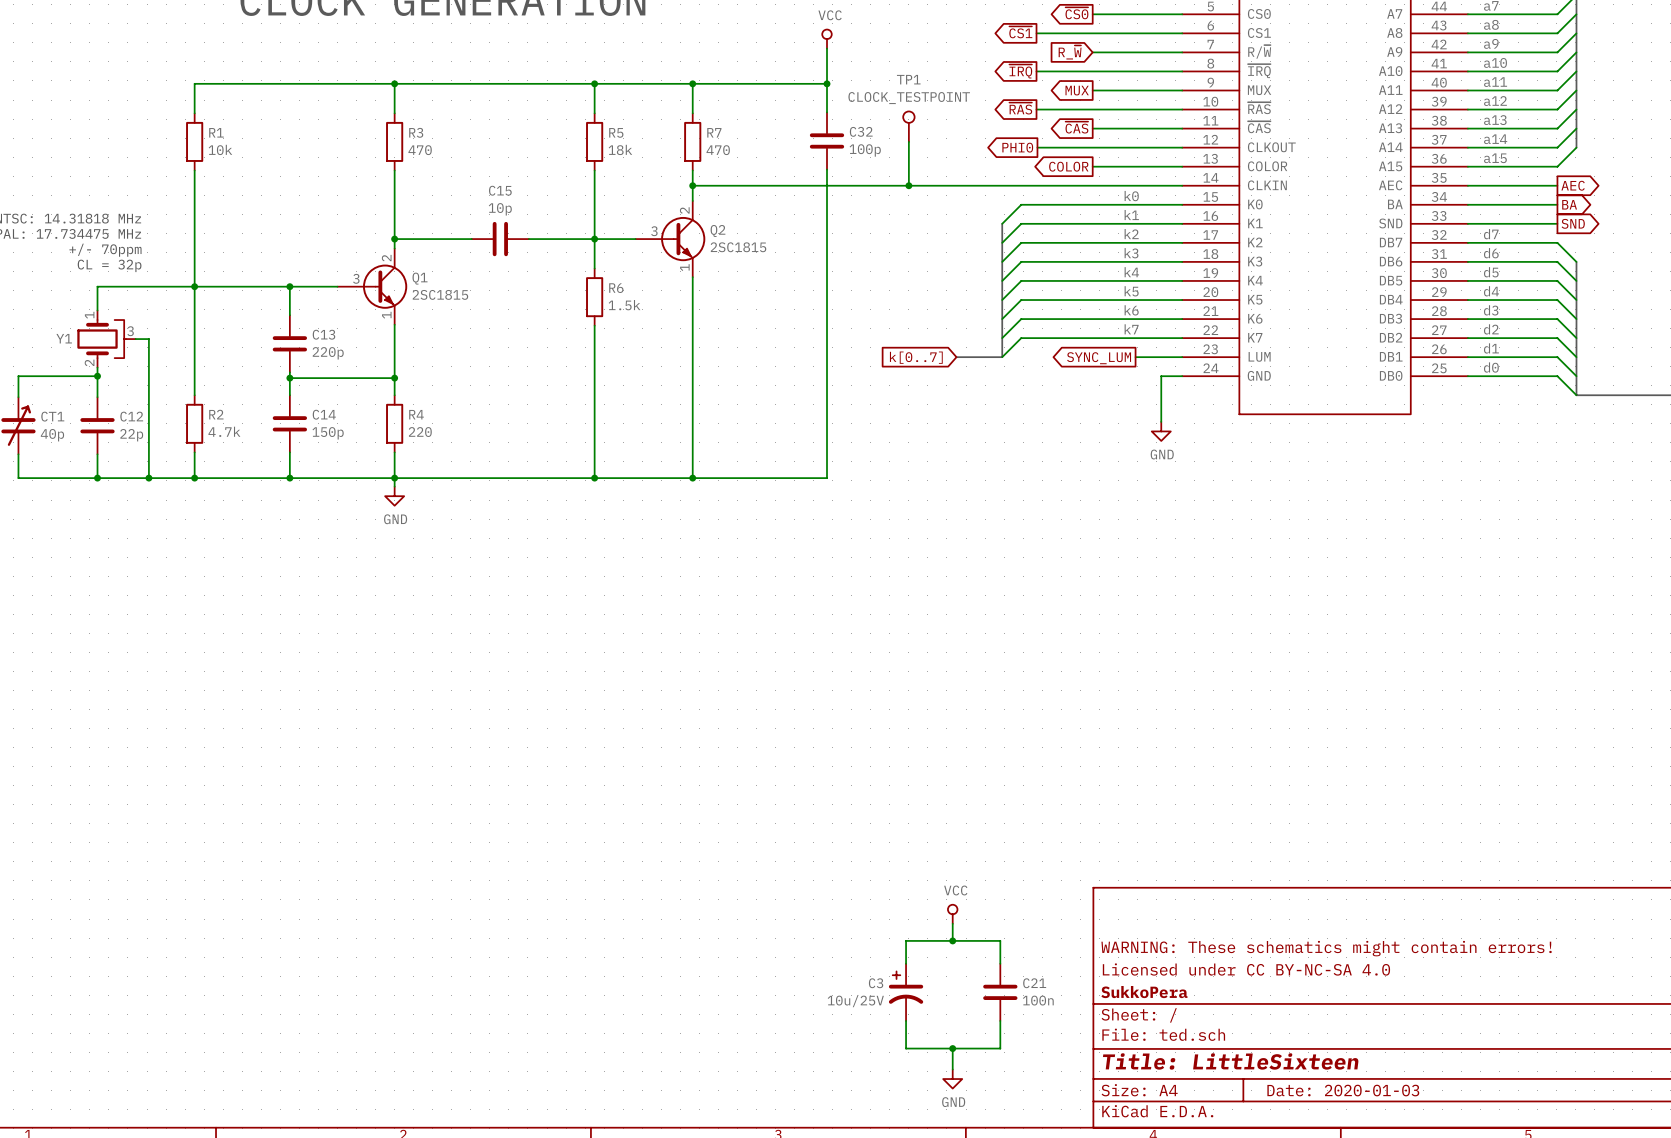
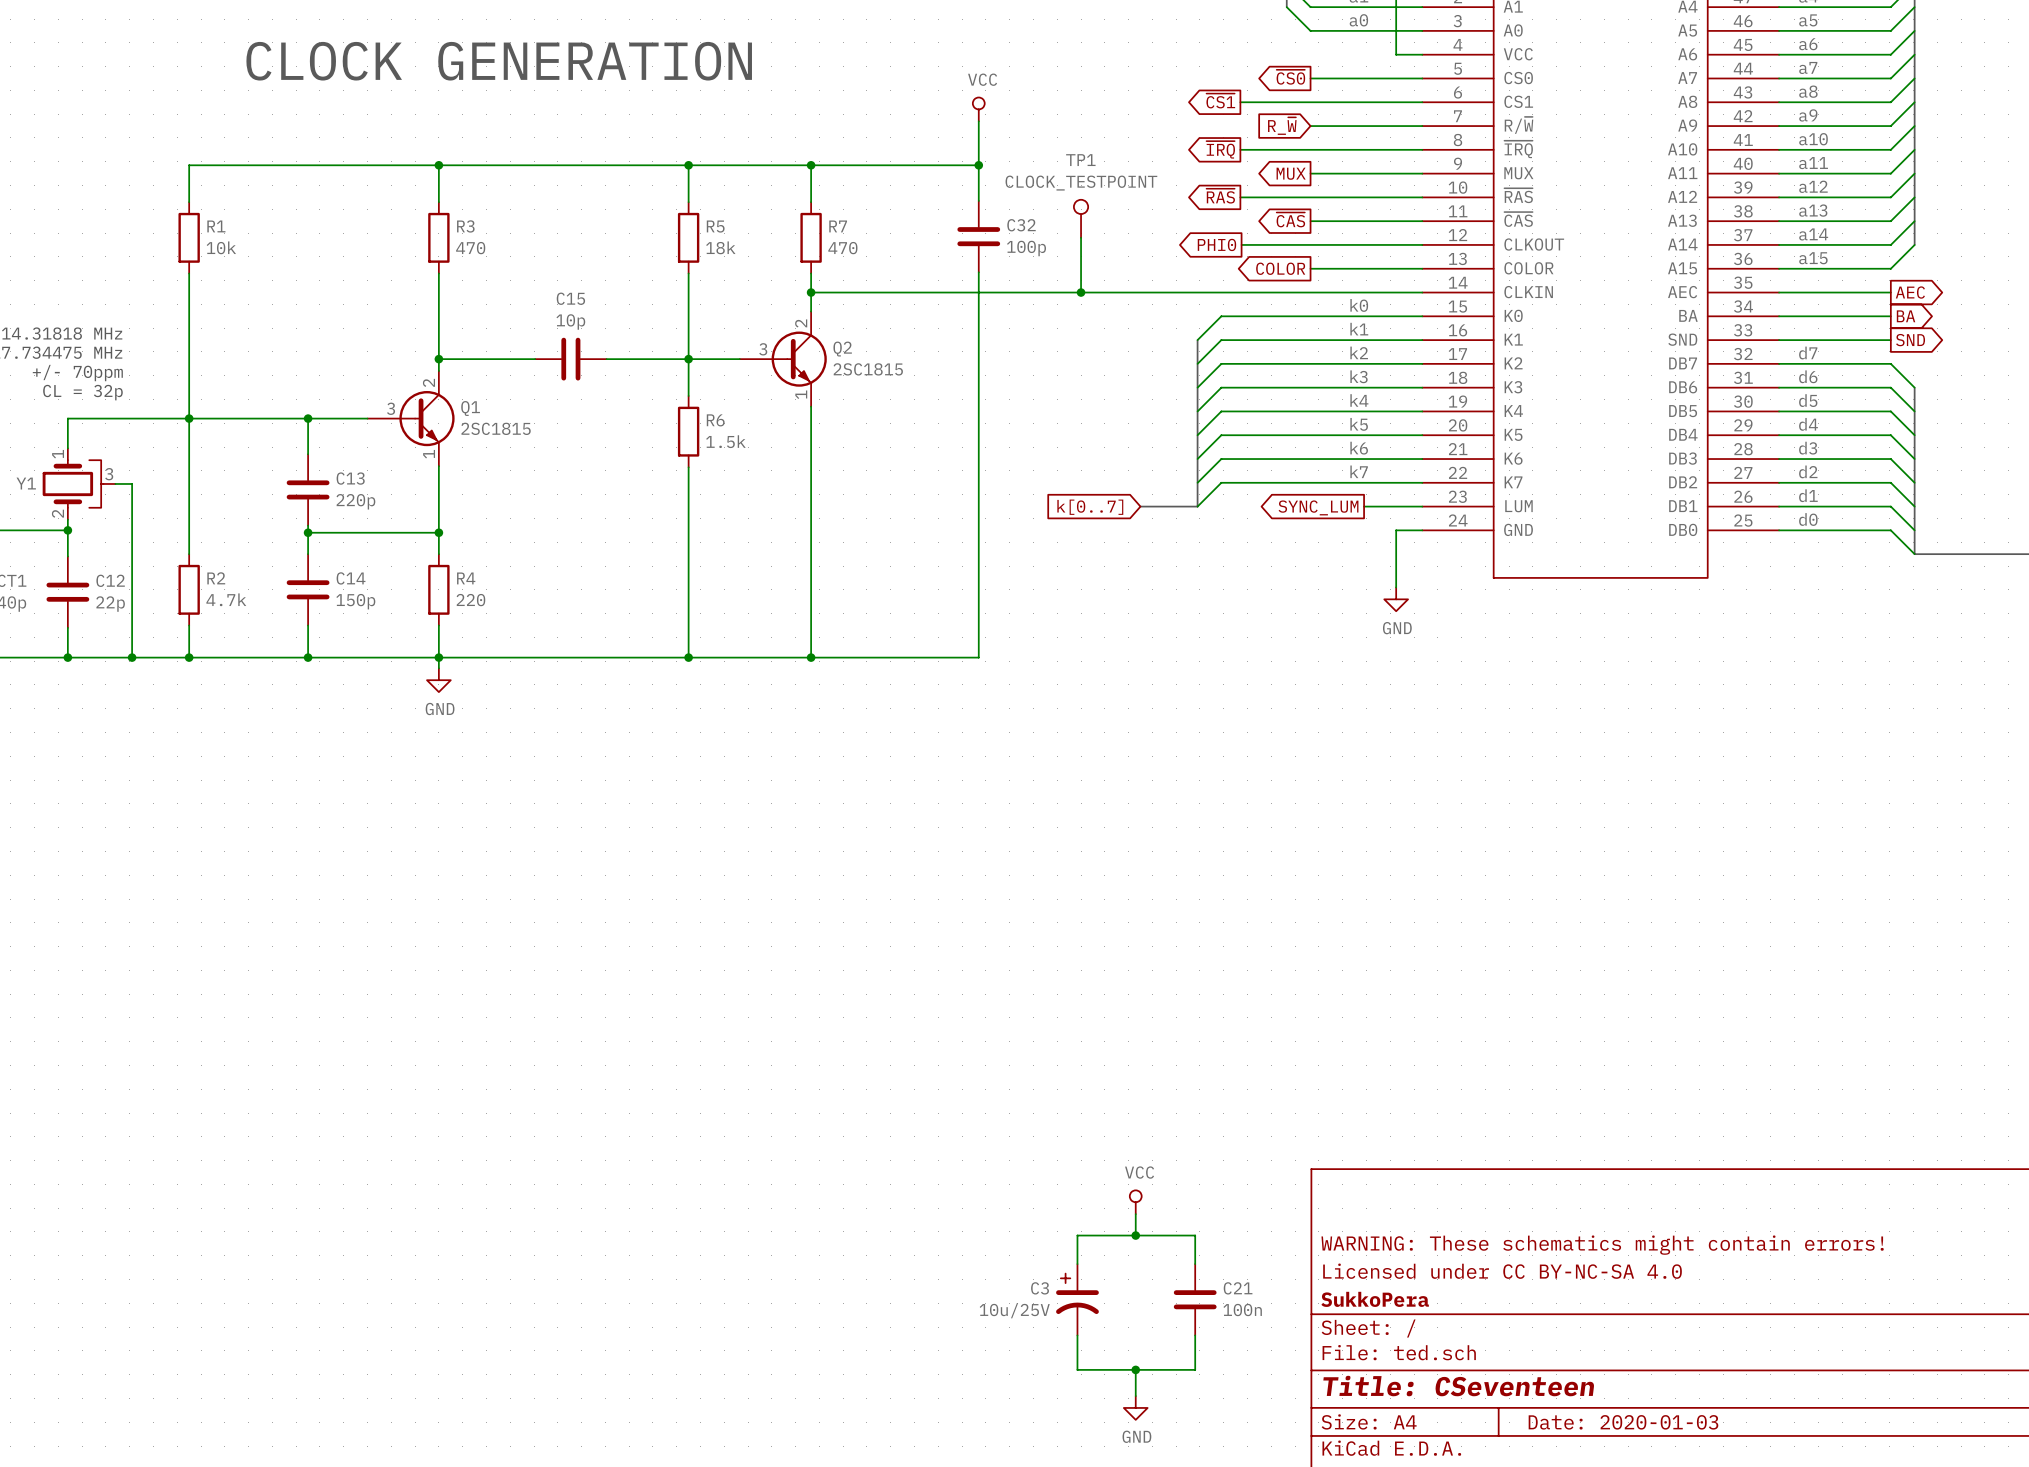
title block: Title: LittleSixteen (1230, 1061) -> Title: CSeventeen (1458, 1386)

